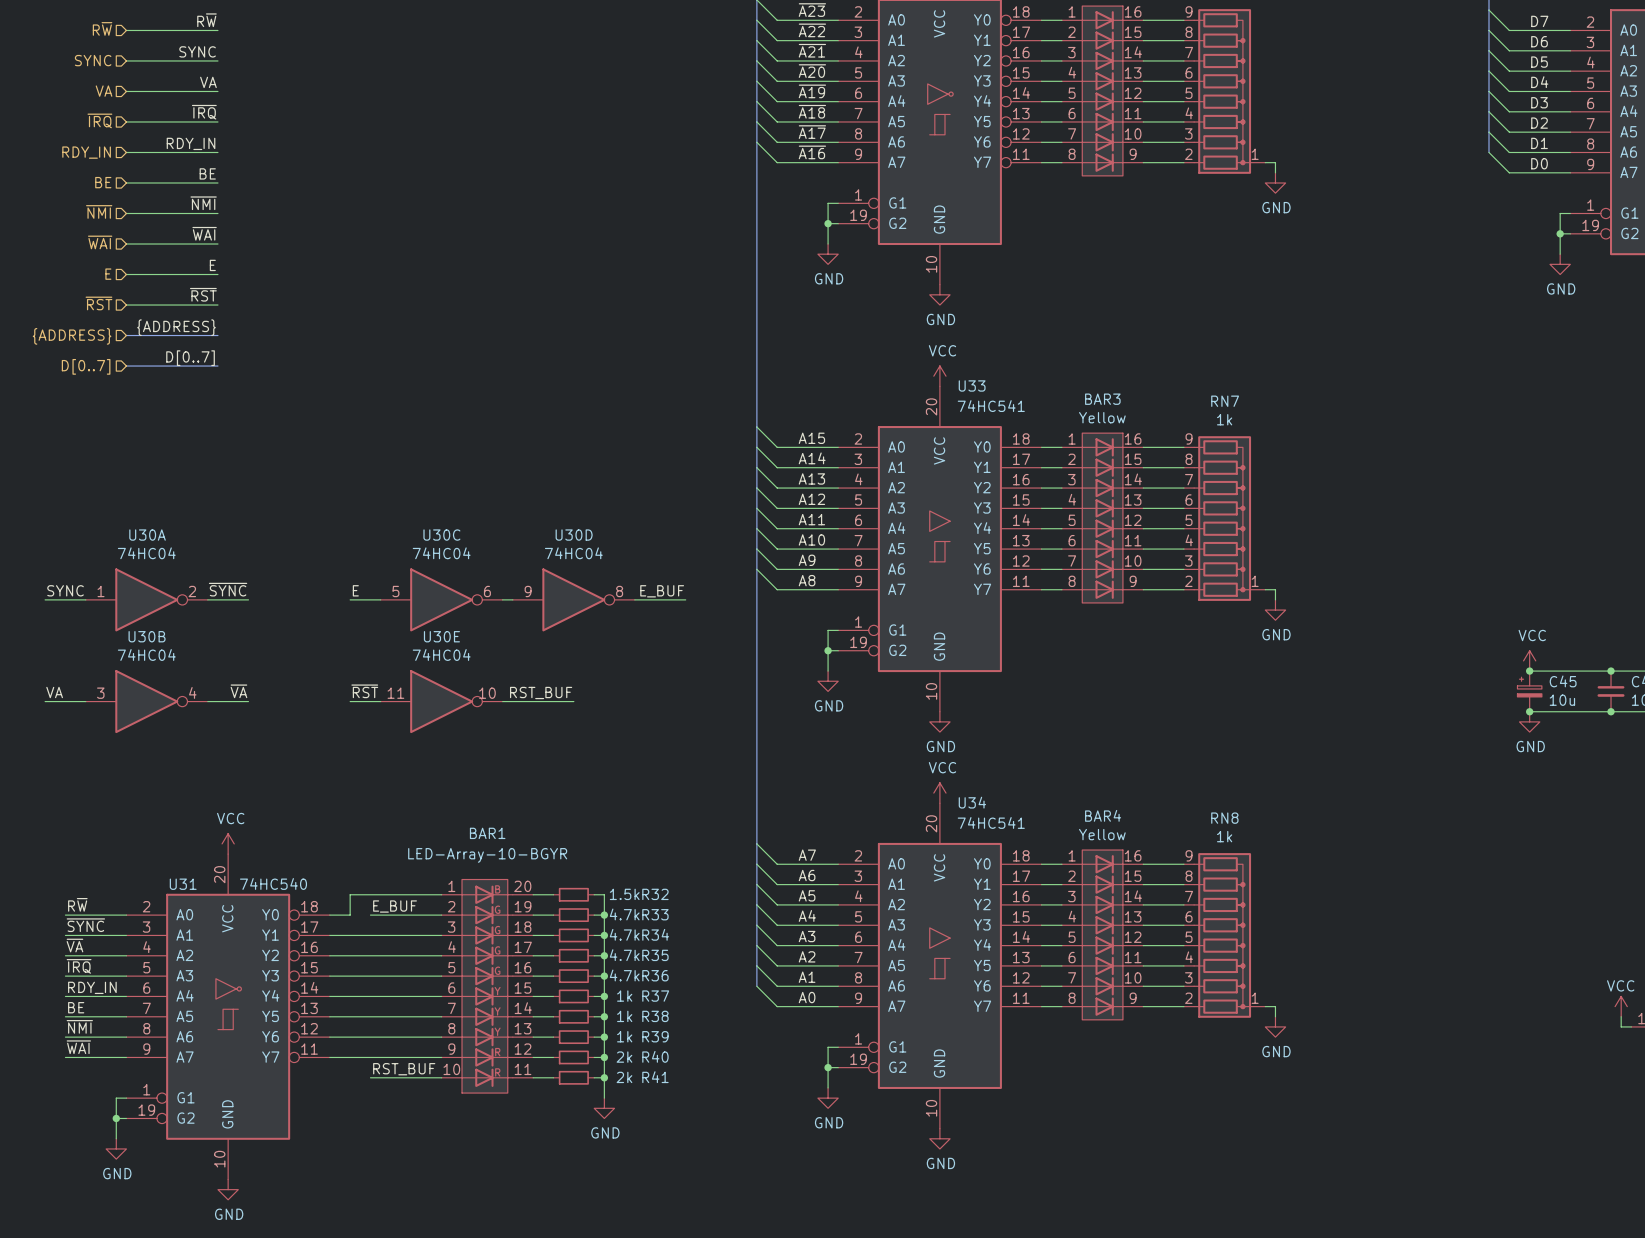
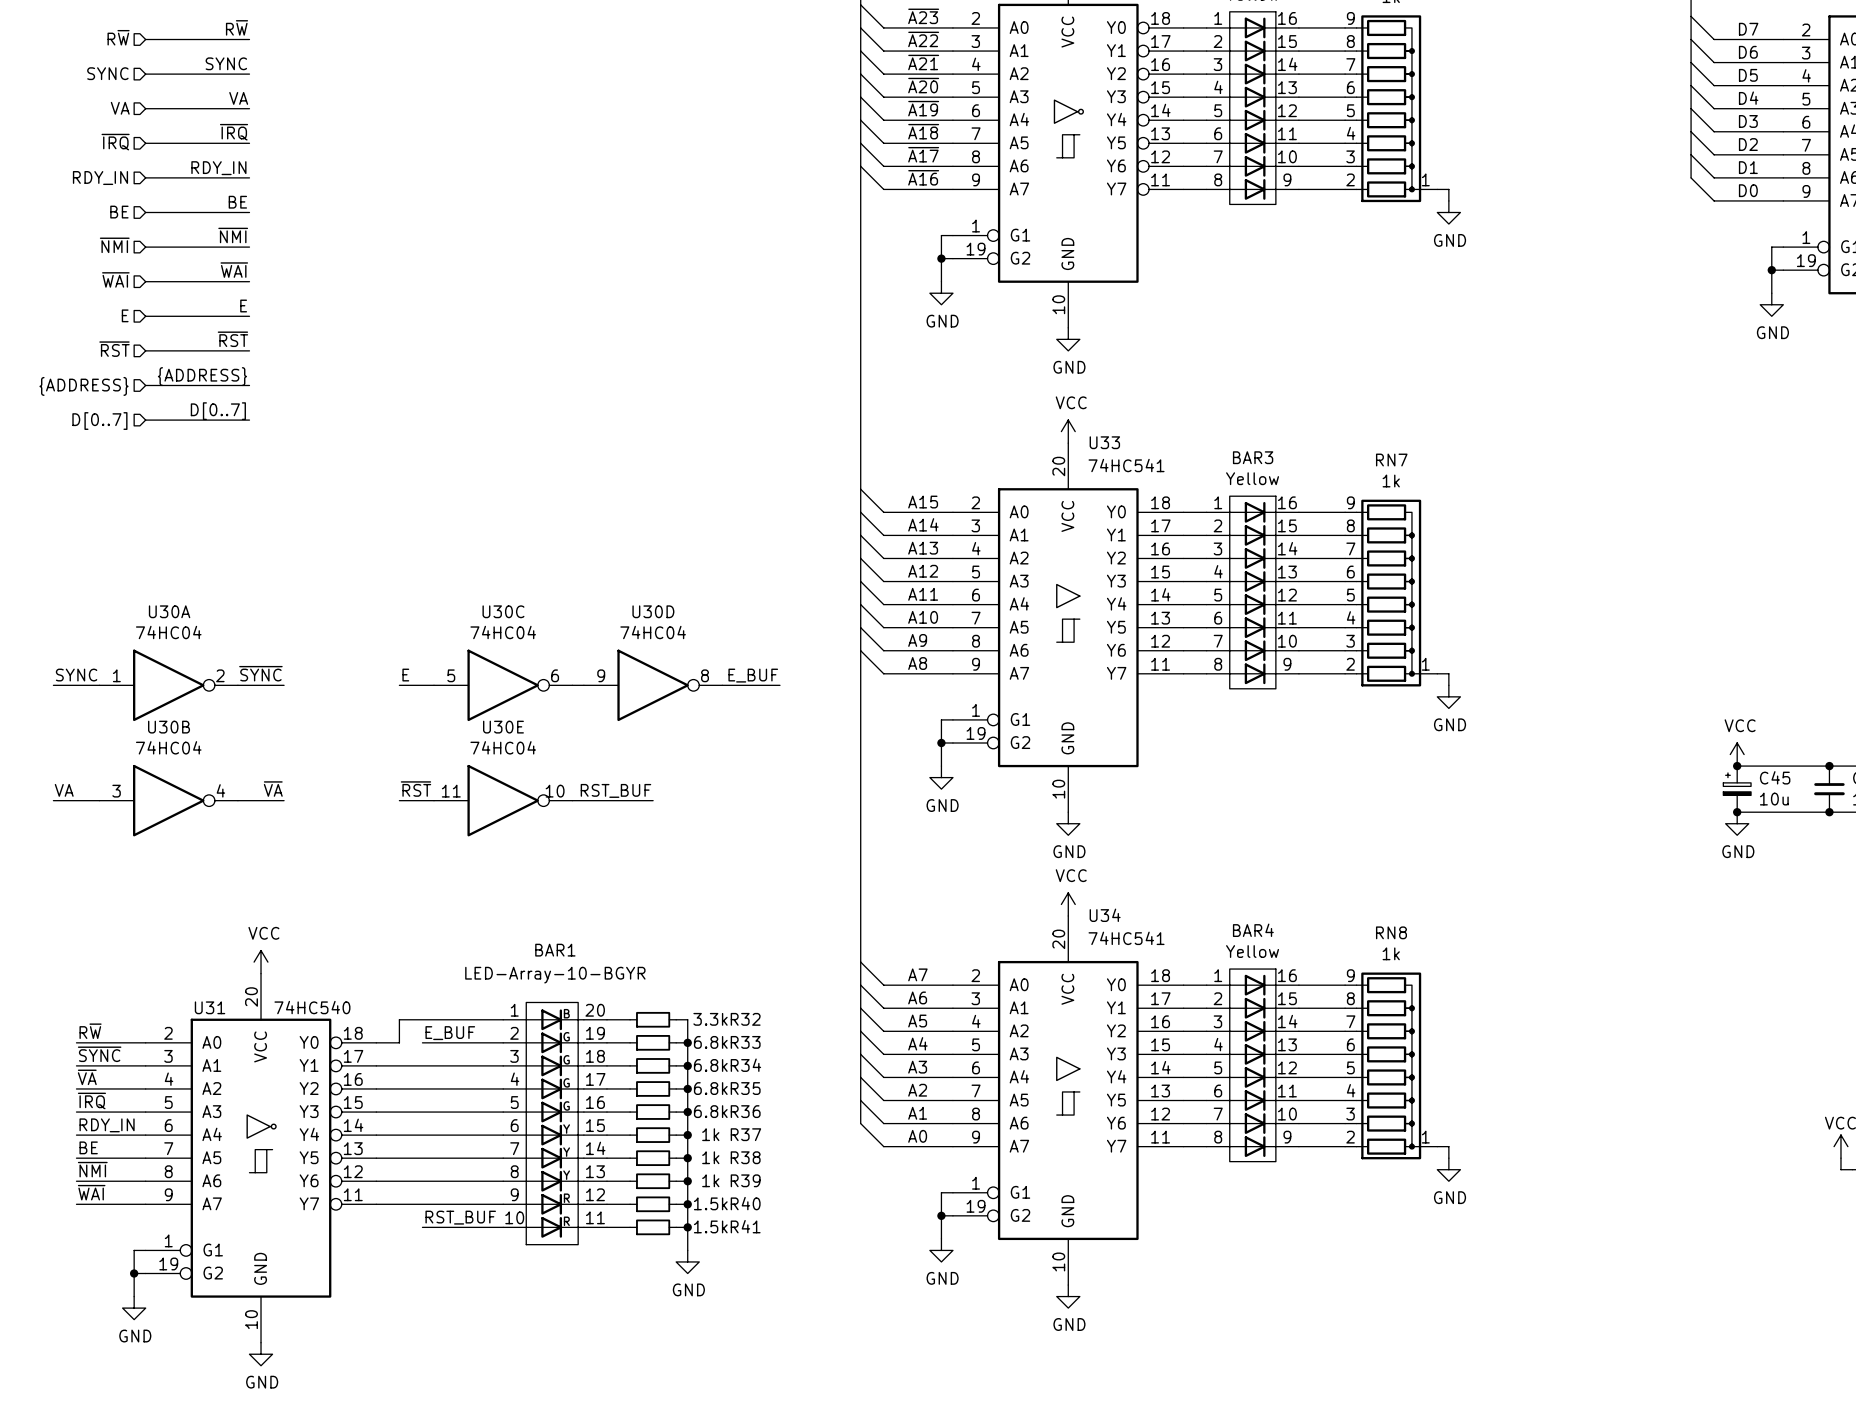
R32 value: 1.5k (624, 894) -> 3.3k (710, 1019)
R33 value: 4.7k (624, 914) -> 6.8k (710, 1042)
R34 value: 4.7k (624, 934) -> 6.8k (710, 1065)
R35 value: 4.7k (624, 955) -> 6.8k (710, 1088)
R36 value: 4.7k (624, 975) -> 6.8k (710, 1111)
R40 value: 2k (624, 1057) -> 1.5k (710, 1203)
R41 value: 2k (624, 1077) -> 1.5k (710, 1226)

